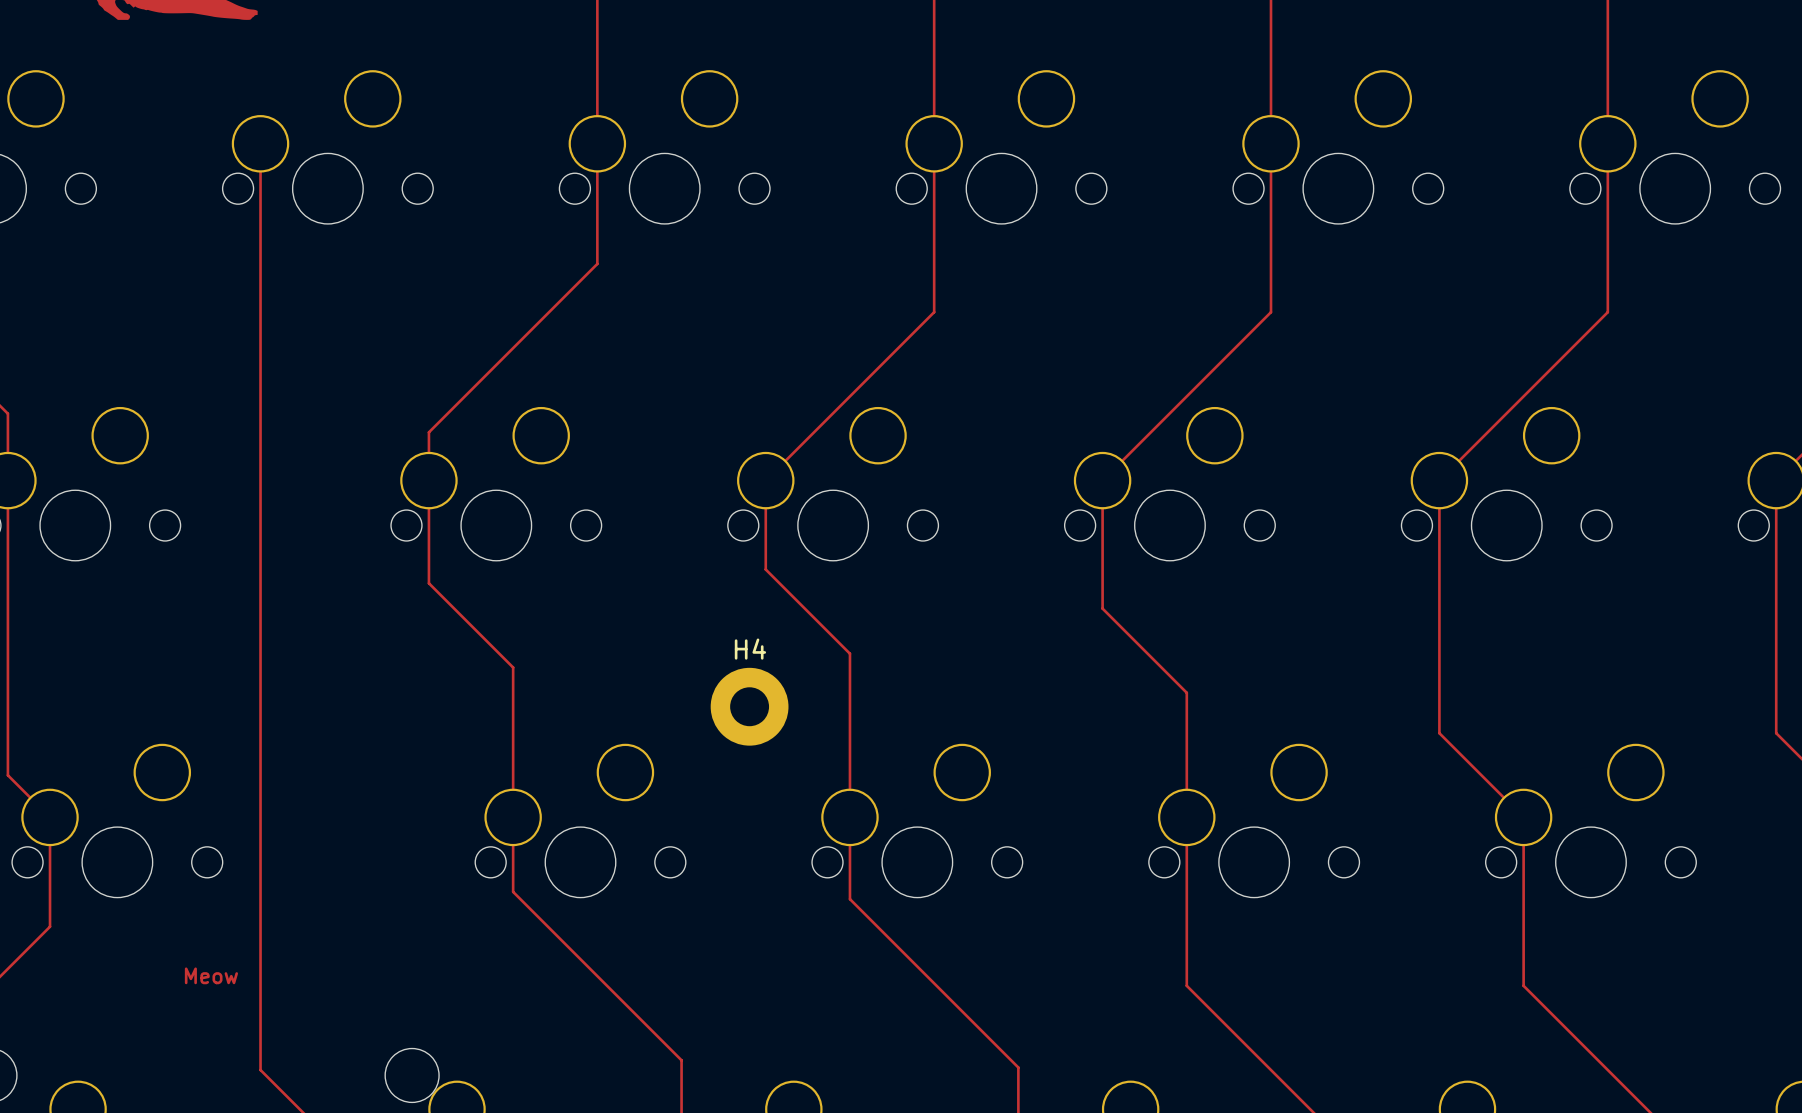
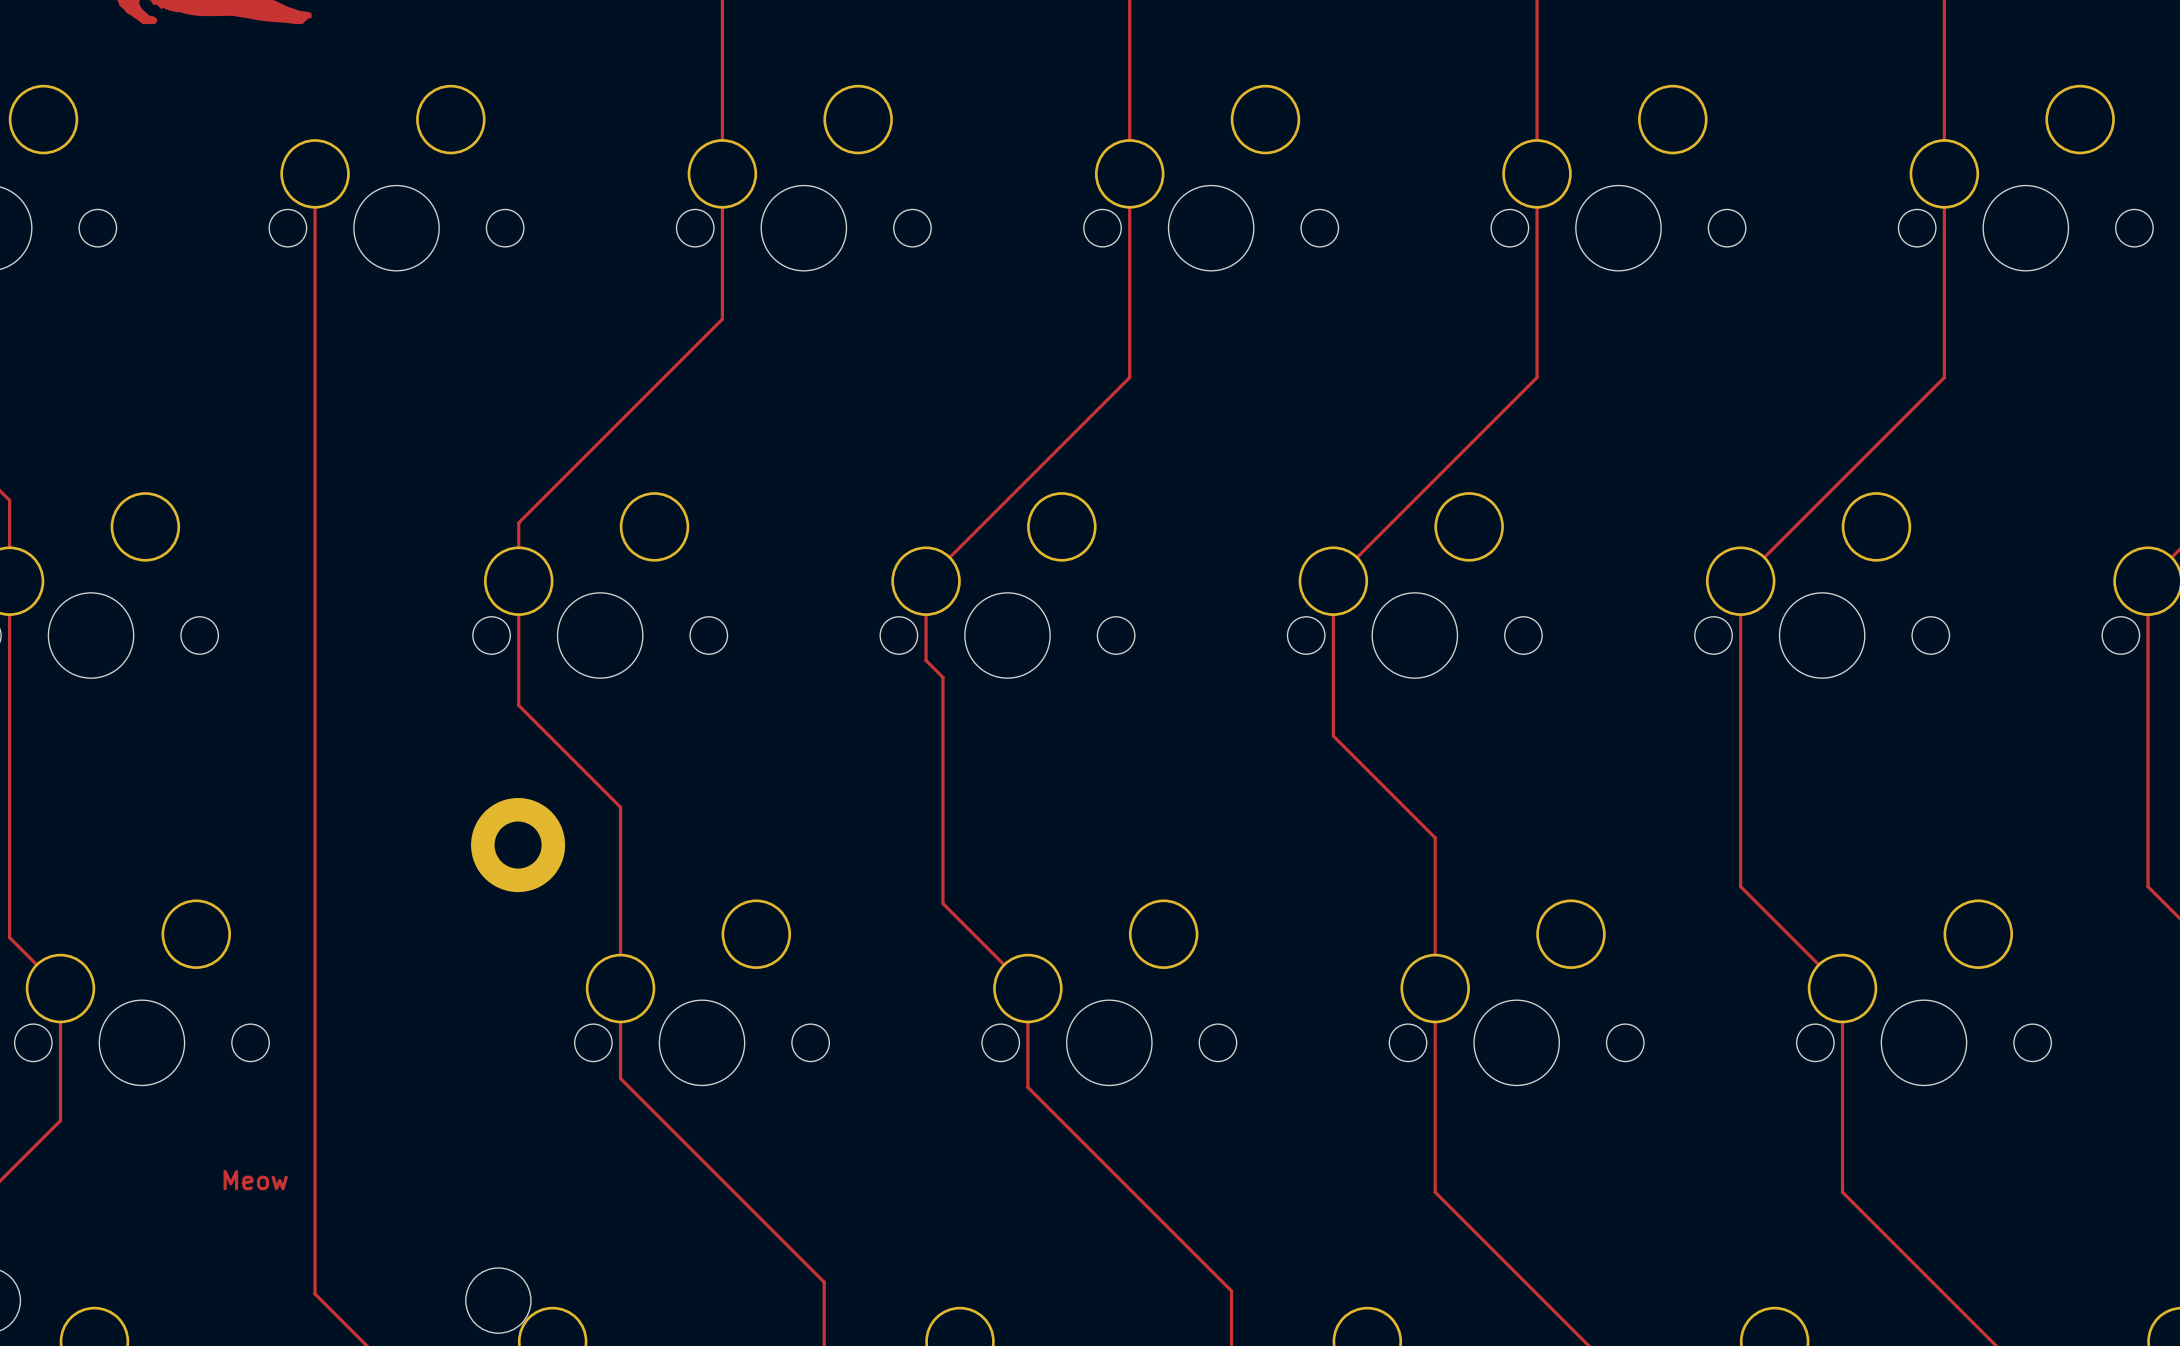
track: (765, 546) (765, 569) (849, 653) (849, 817) -> (926, 660) (942, 677) (942, 903) (1027, 988)
part: none -> (518, 845)
H4: (749, 706) -> none

